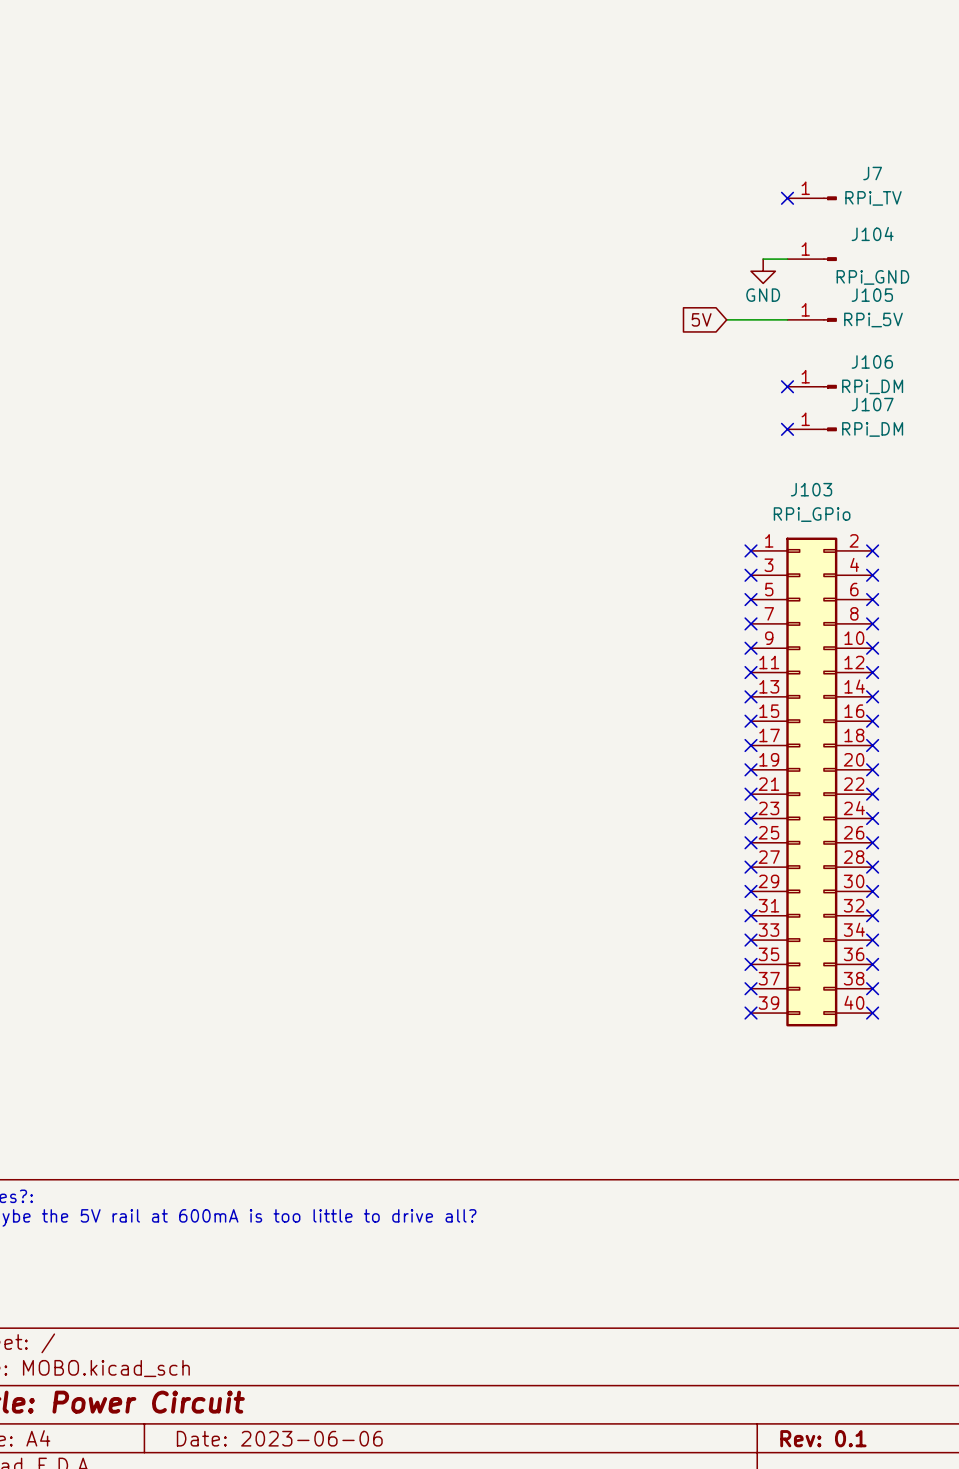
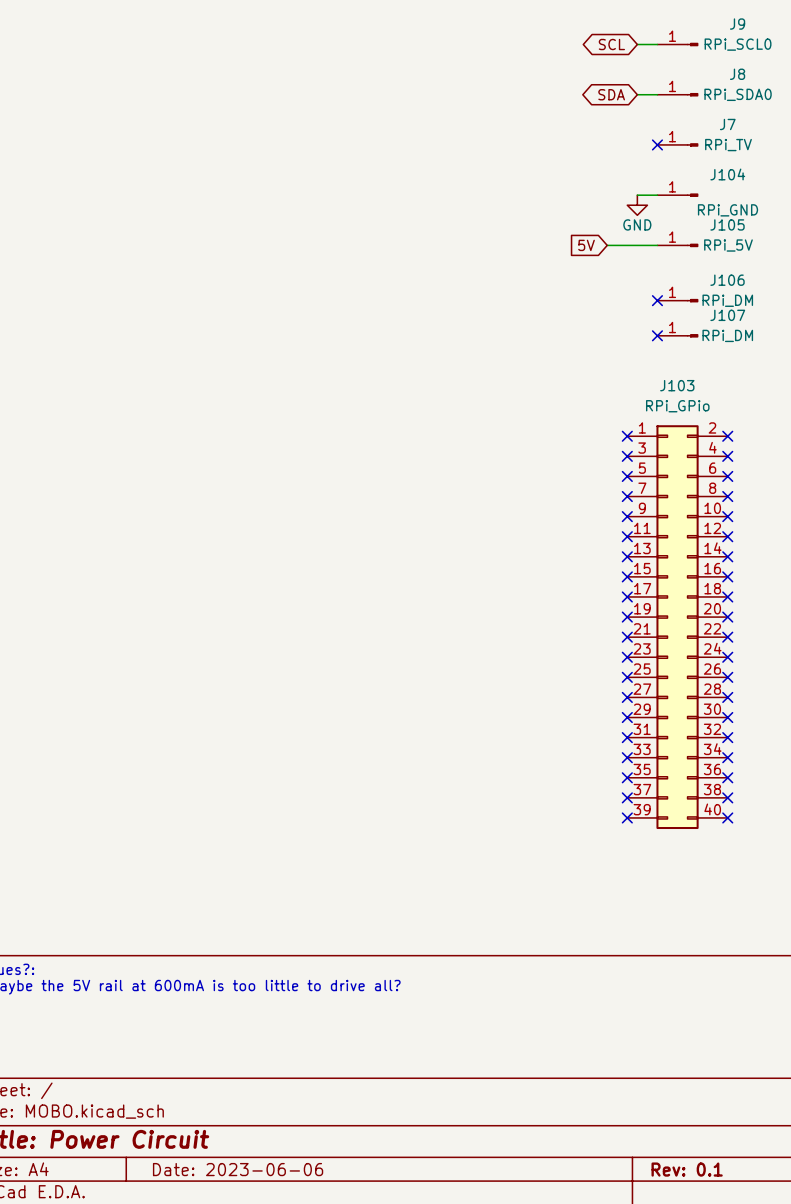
global label: none -> SCL (611, 44)
wire: none -> (637, 44) (657, 44)
J9: none -> RPi_SCL0 (677, 44)
global label: none -> SDA (611, 94)
wire: none -> (637, 94) (657, 94)
J8: none -> RPi_SDA0 (677, 94)

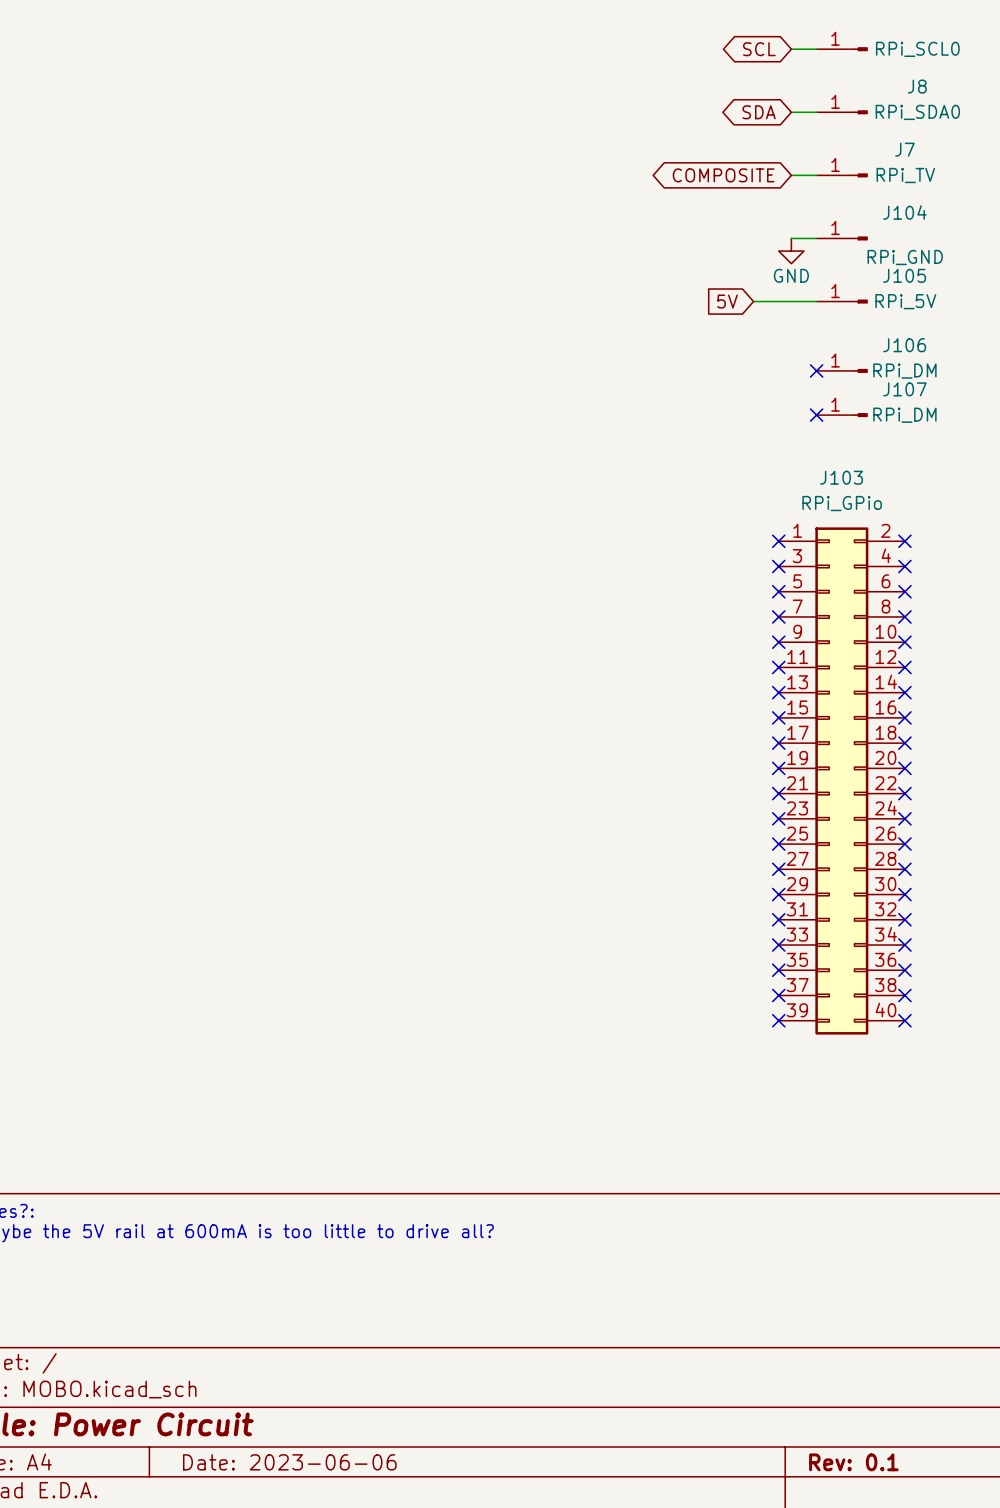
J9 name: J9 (737, 24) -> none
global label: none -> COMPOSITE (723, 175)
wire: none -> (791, 175) (816, 175)
no-connect mark: (657, 144) -> none

